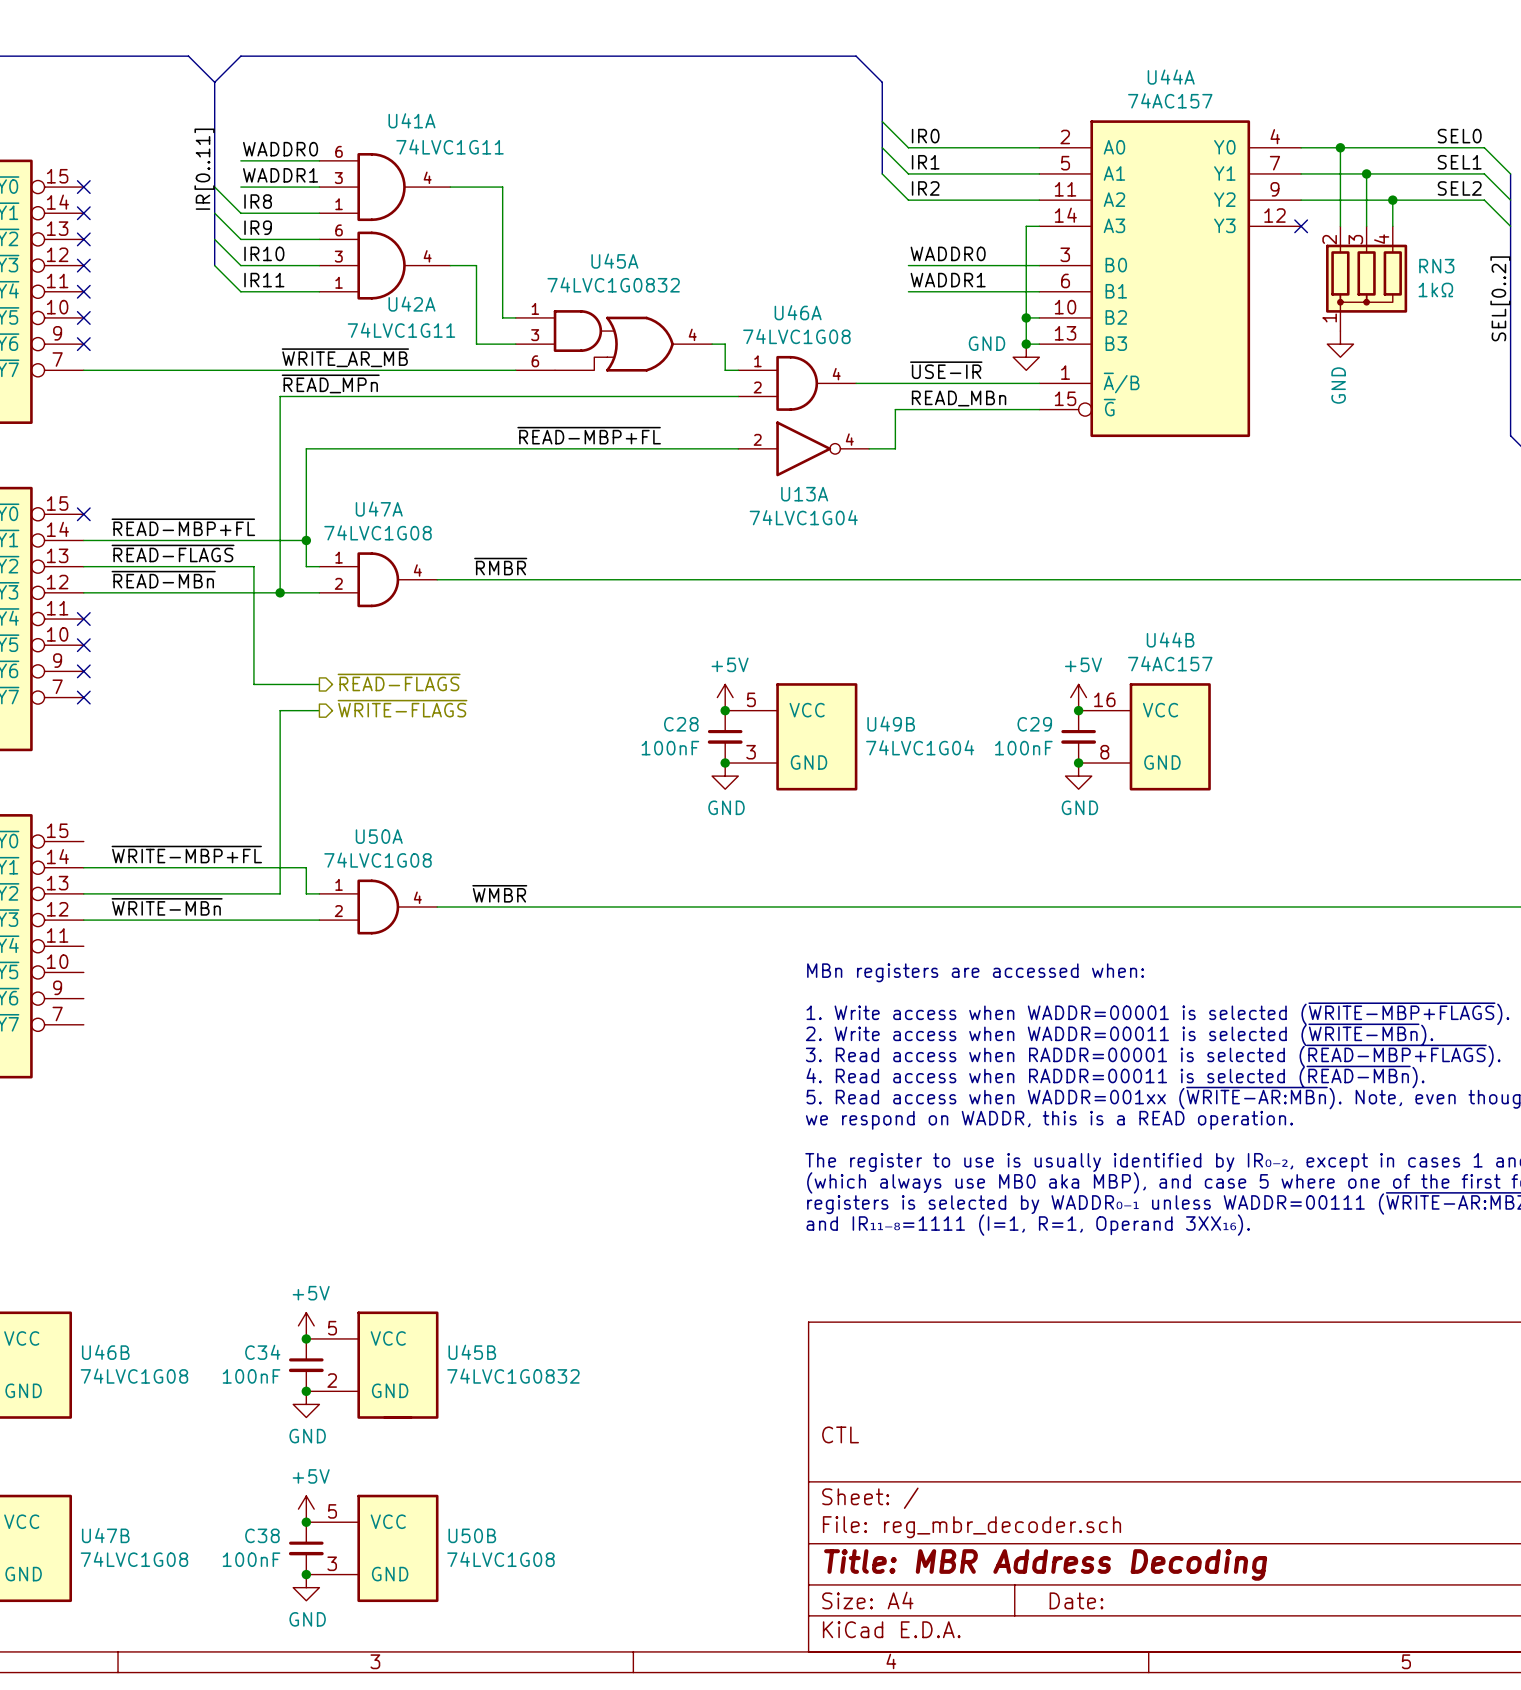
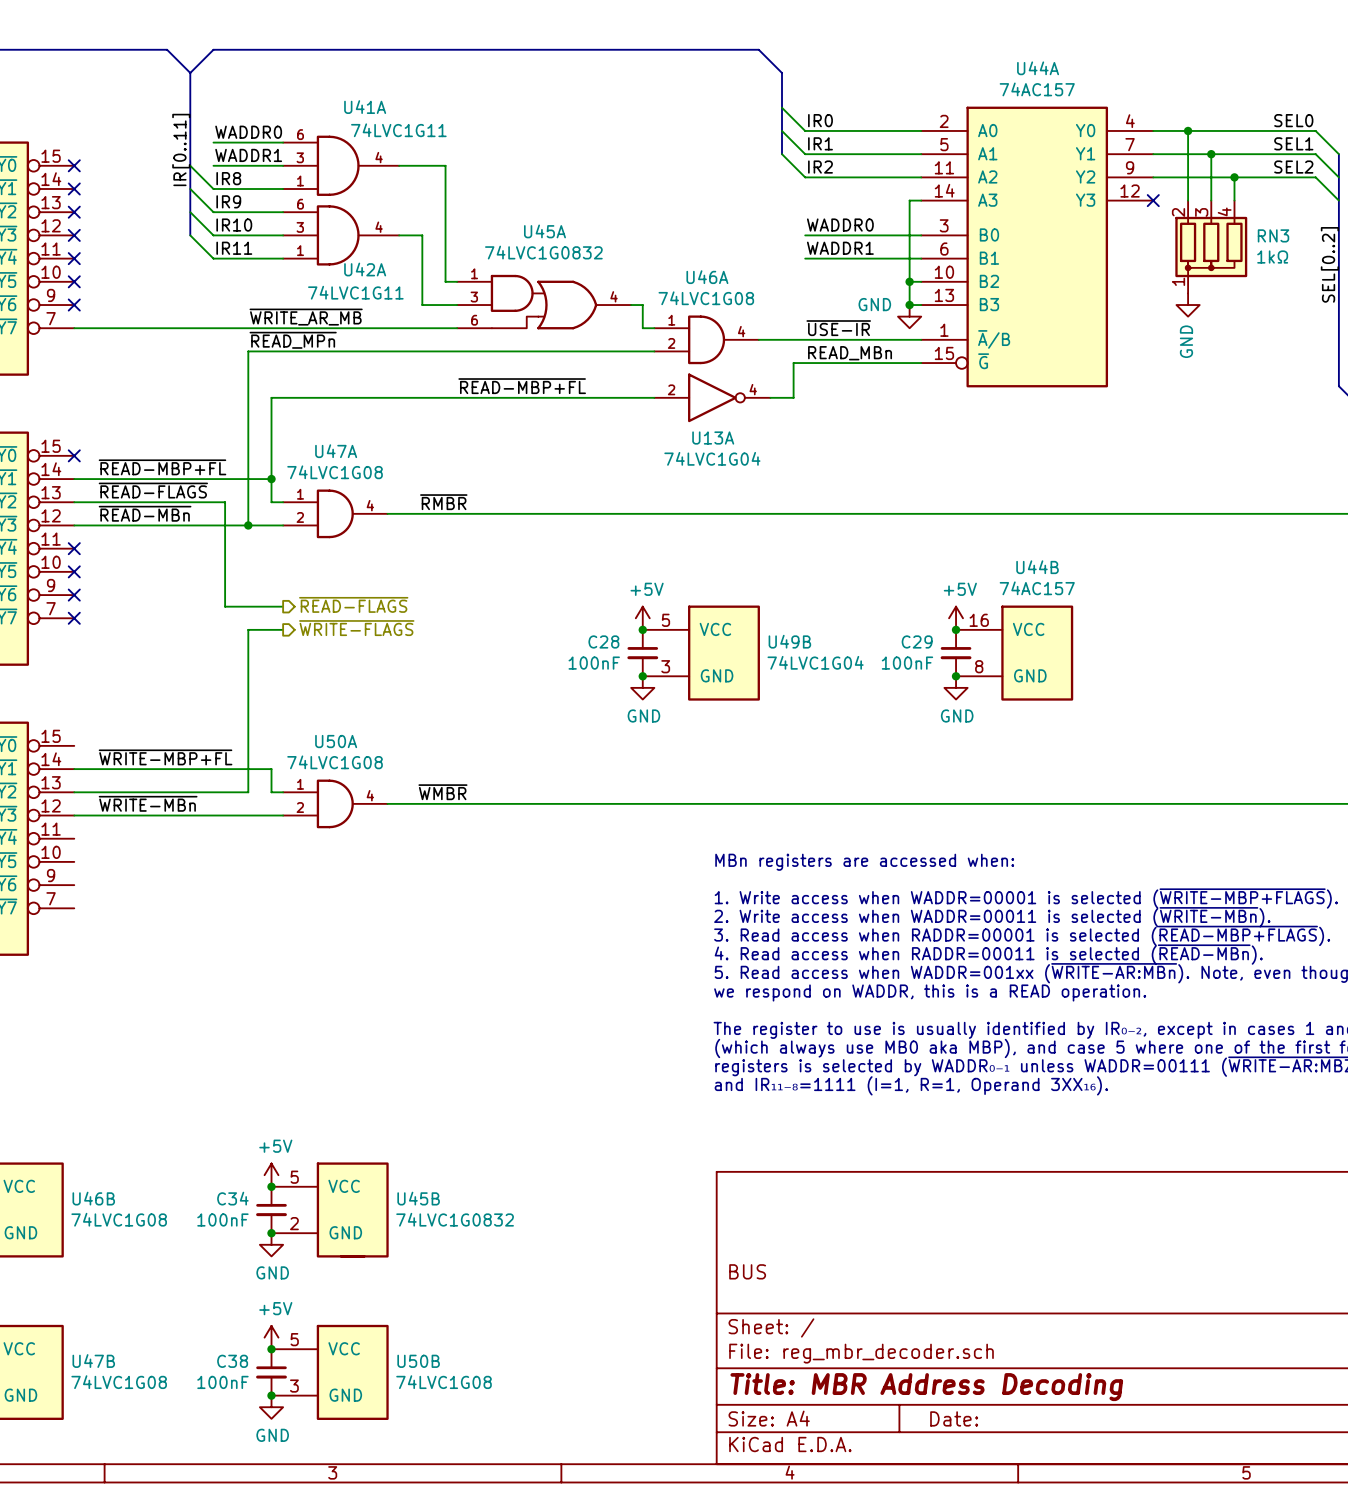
title block: CTL (840, 1434) -> BUS (747, 1271)

